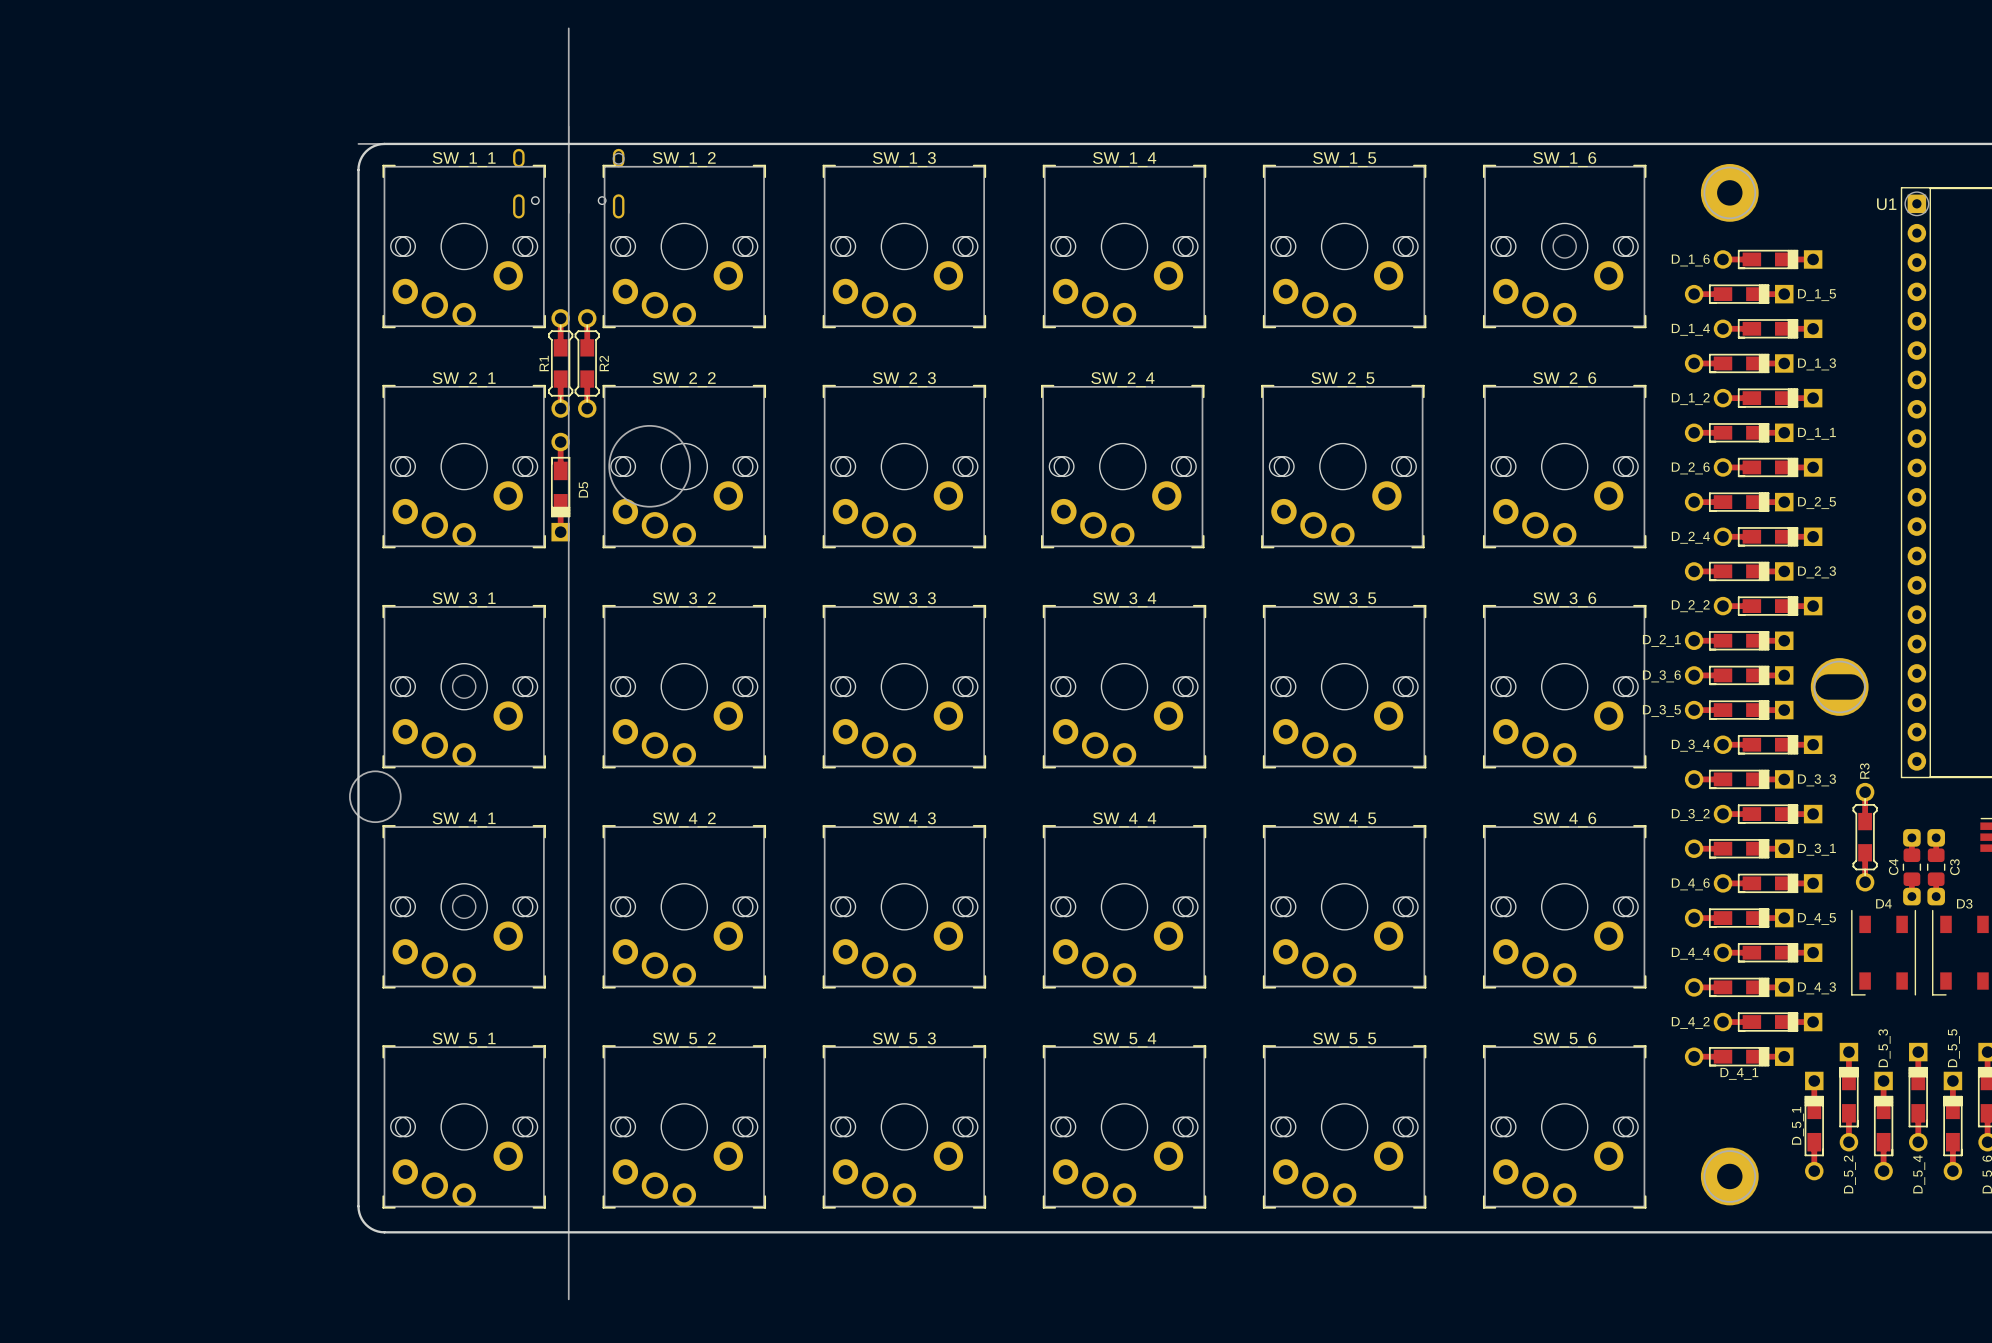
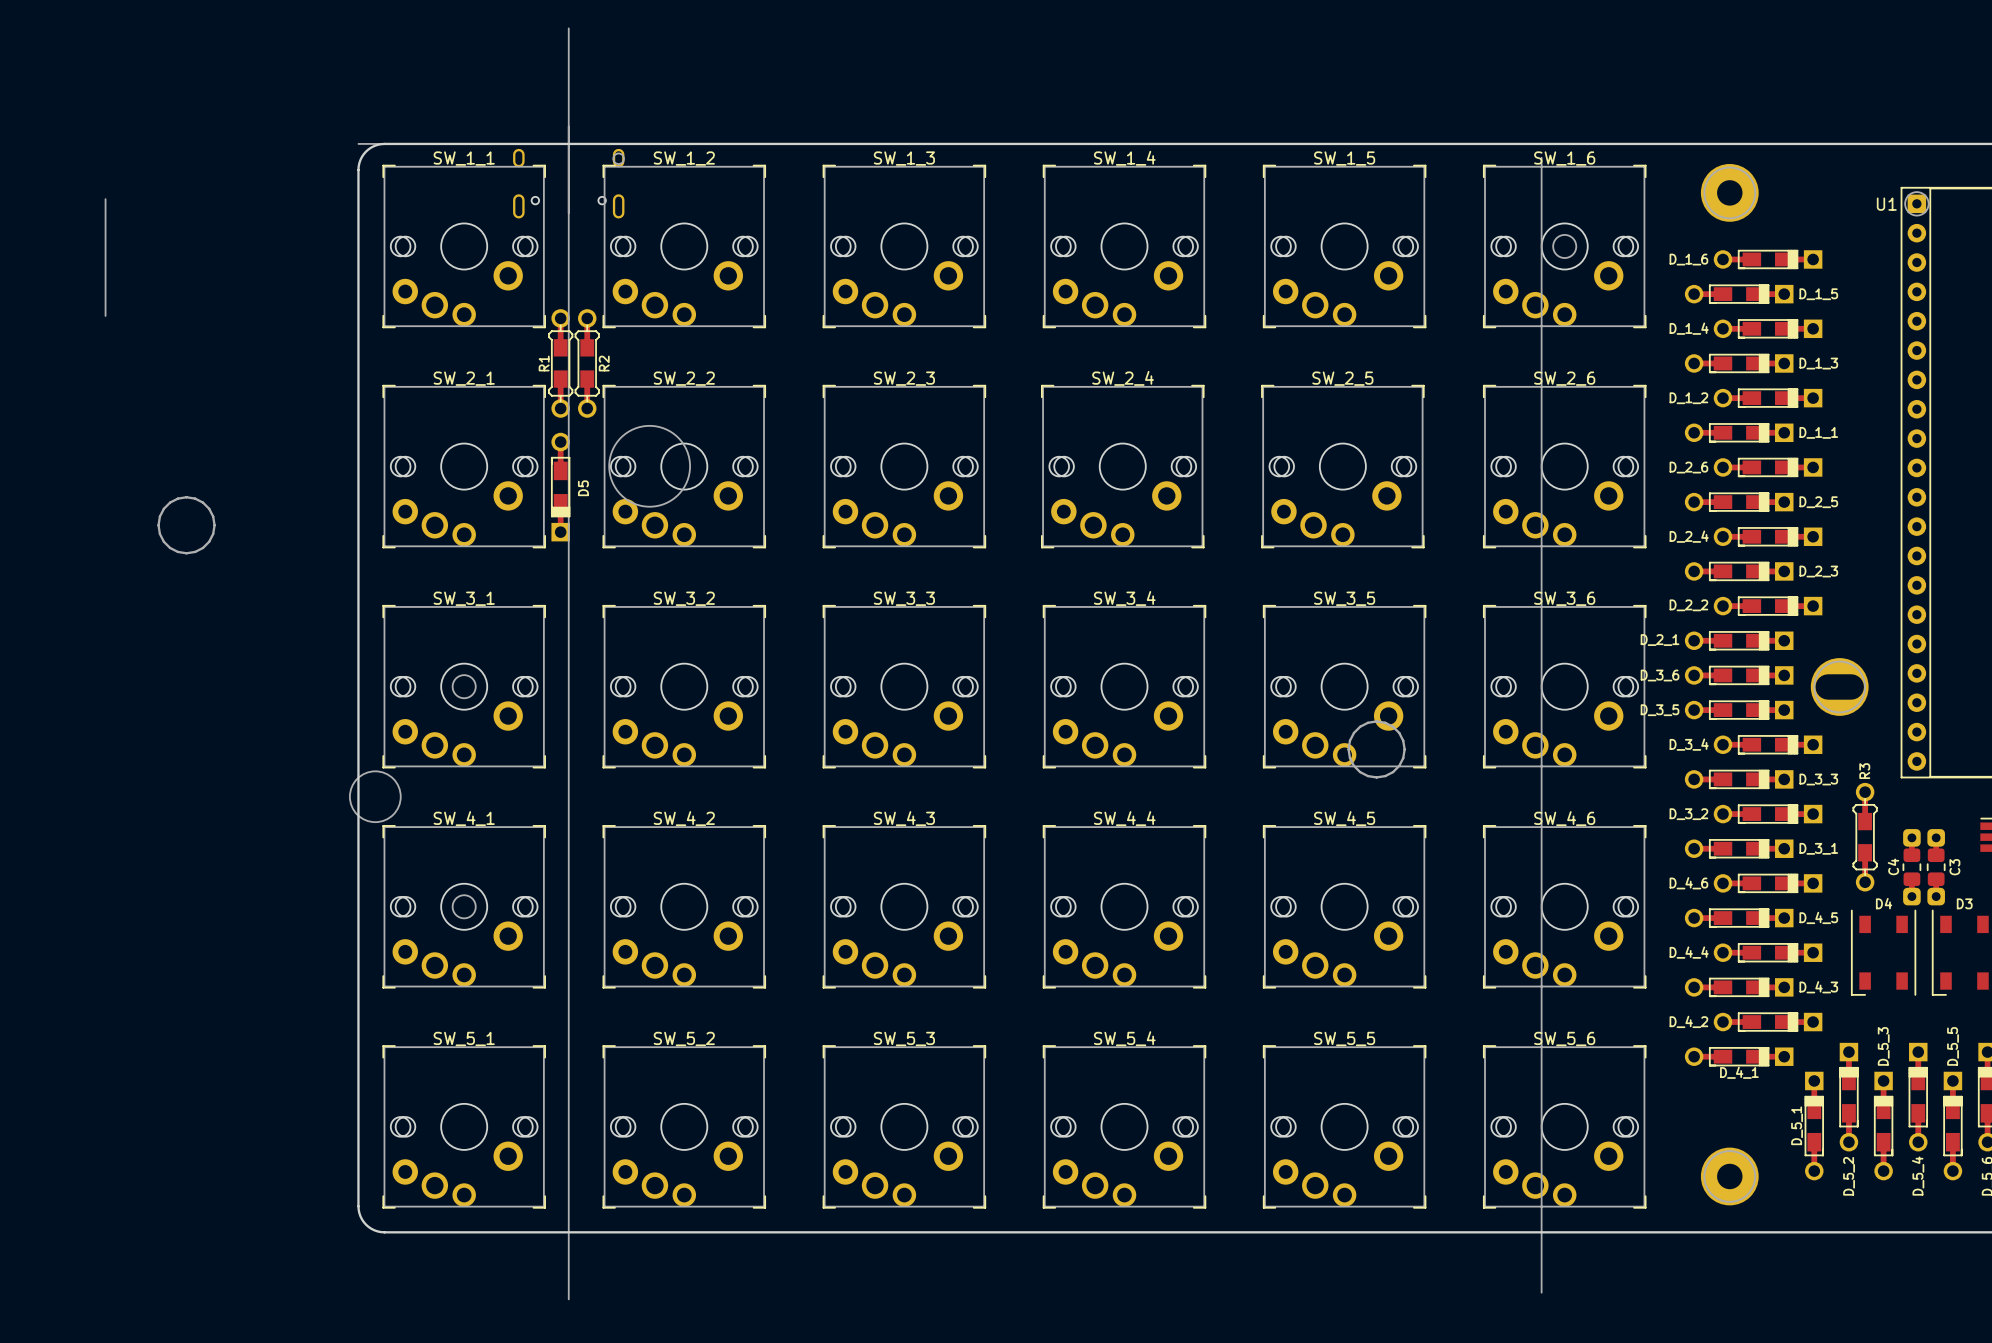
line: none -> (1541, 157) (1541, 1292)
line: none -> (105, 199) (105, 315)
line: none -> (186, 497) (170, 502) (159, 516) (158, 525) (159, 533) (170, 547) (186, 553) (203, 547) (213, 533) (214, 525) (209, 508) (195, 498) (186, 497)
line: none -> (1376, 721) (1360, 726) (1349, 740) (1348, 749) (1349, 758) (1360, 772) (1376, 777) (1393, 772) (1403, 758) (1404, 749) (1403, 740) (1393, 726) (1376, 721)

